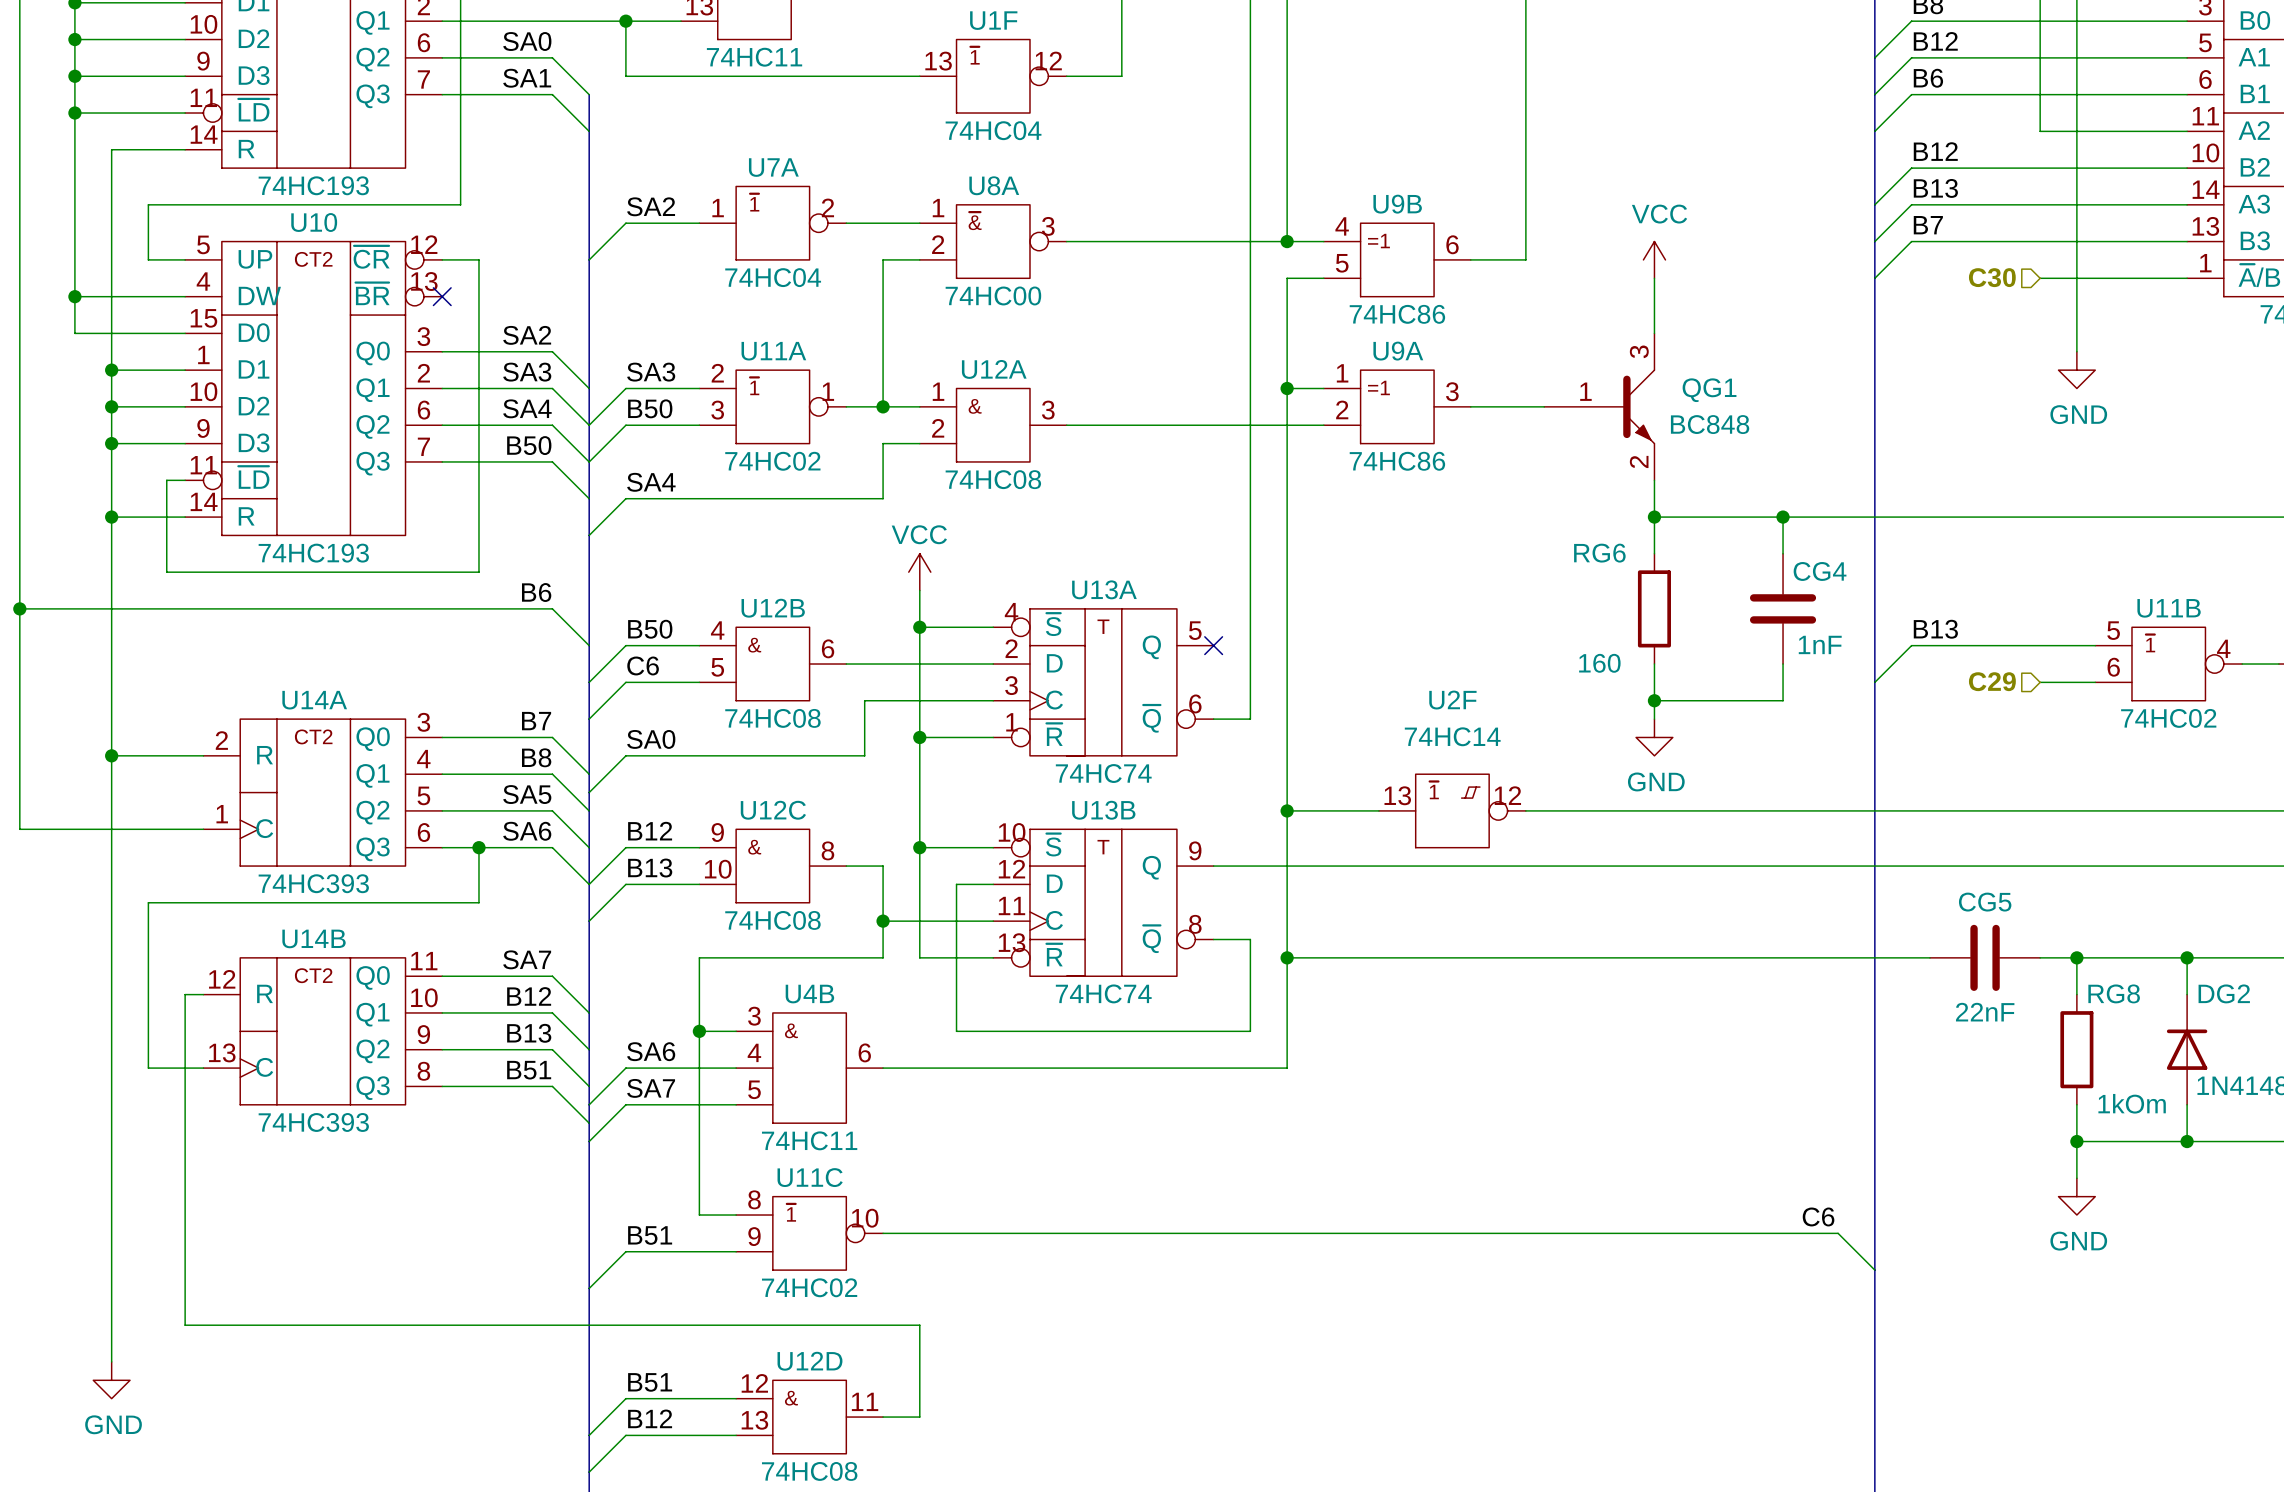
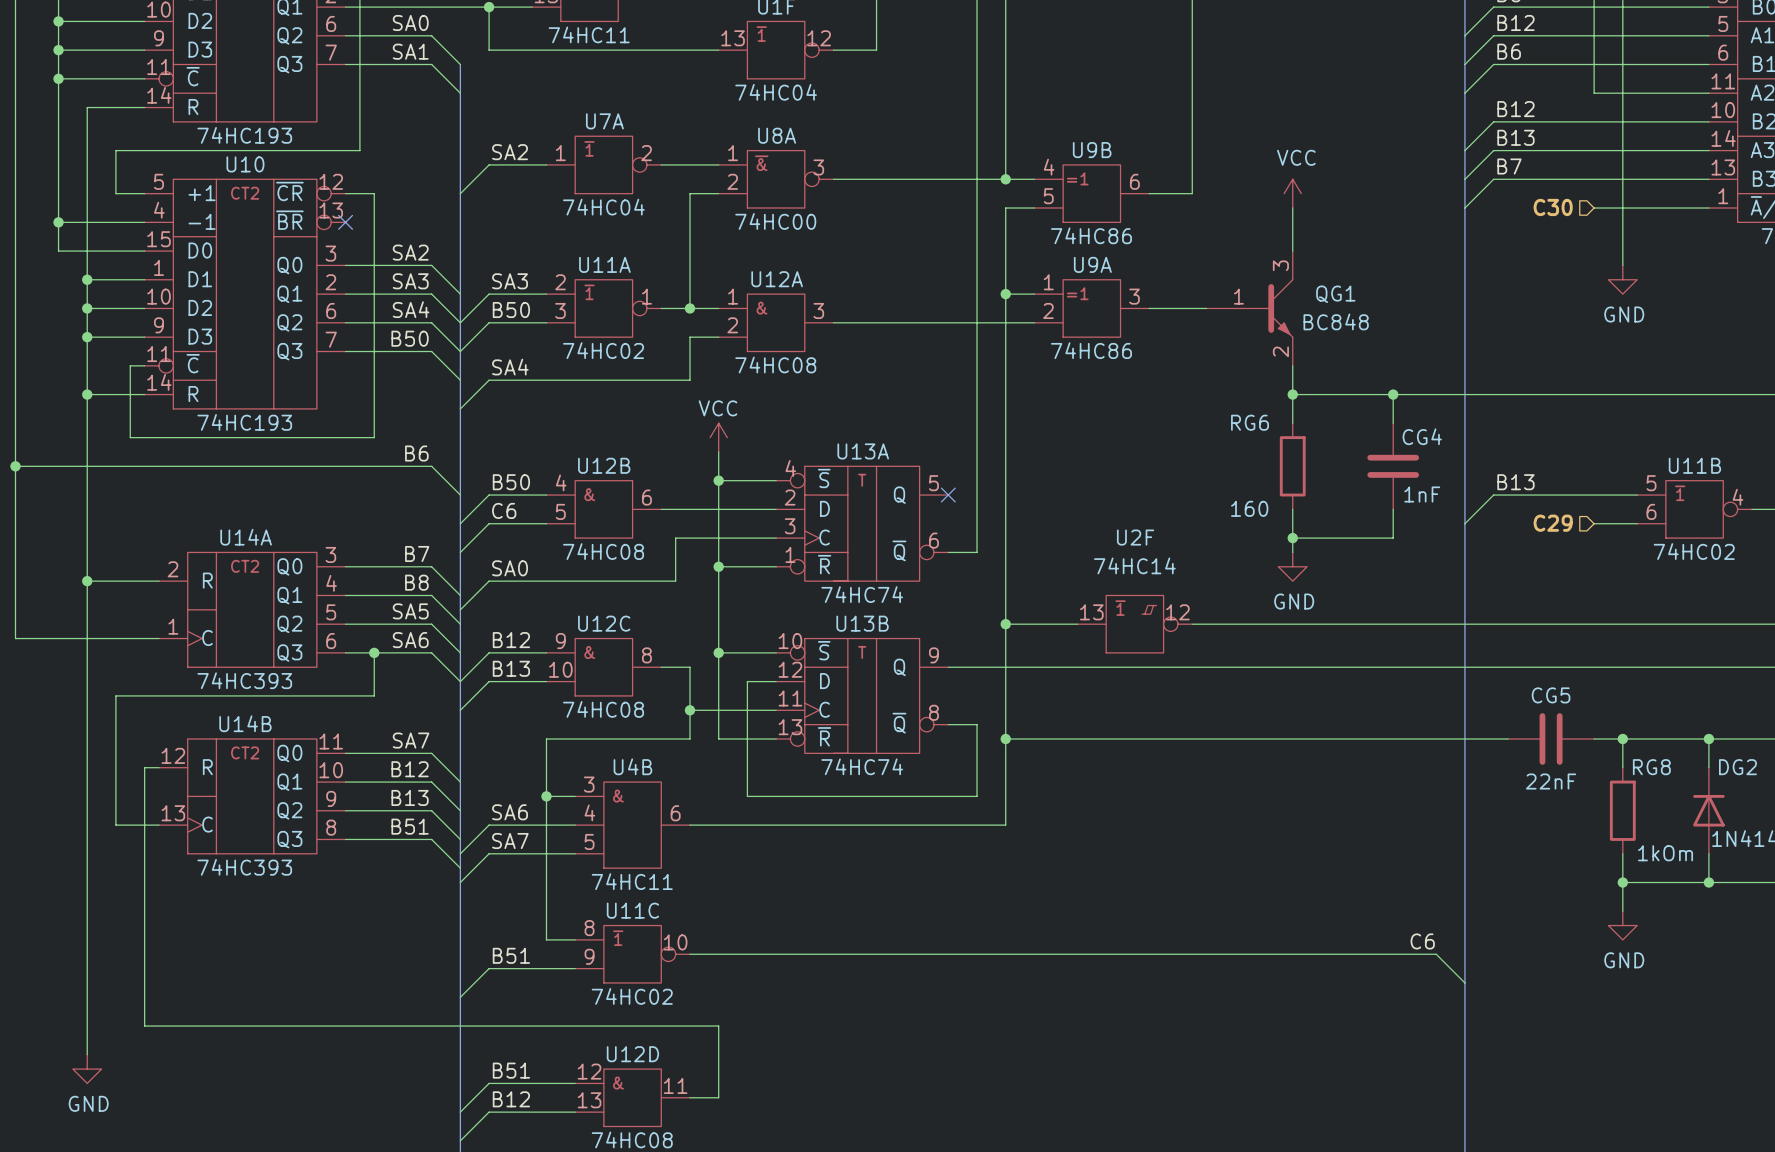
part pin name: ~{LD} (253, 110) -> ~{C} (193, 76)
U10 pin name: UP (255, 259) -> +1 (202, 193)
U10 pin name: DW (259, 295) -> -1 (202, 221)
U10 pin name: ~{LD} (253, 477) -> ~{C} (193, 363)

